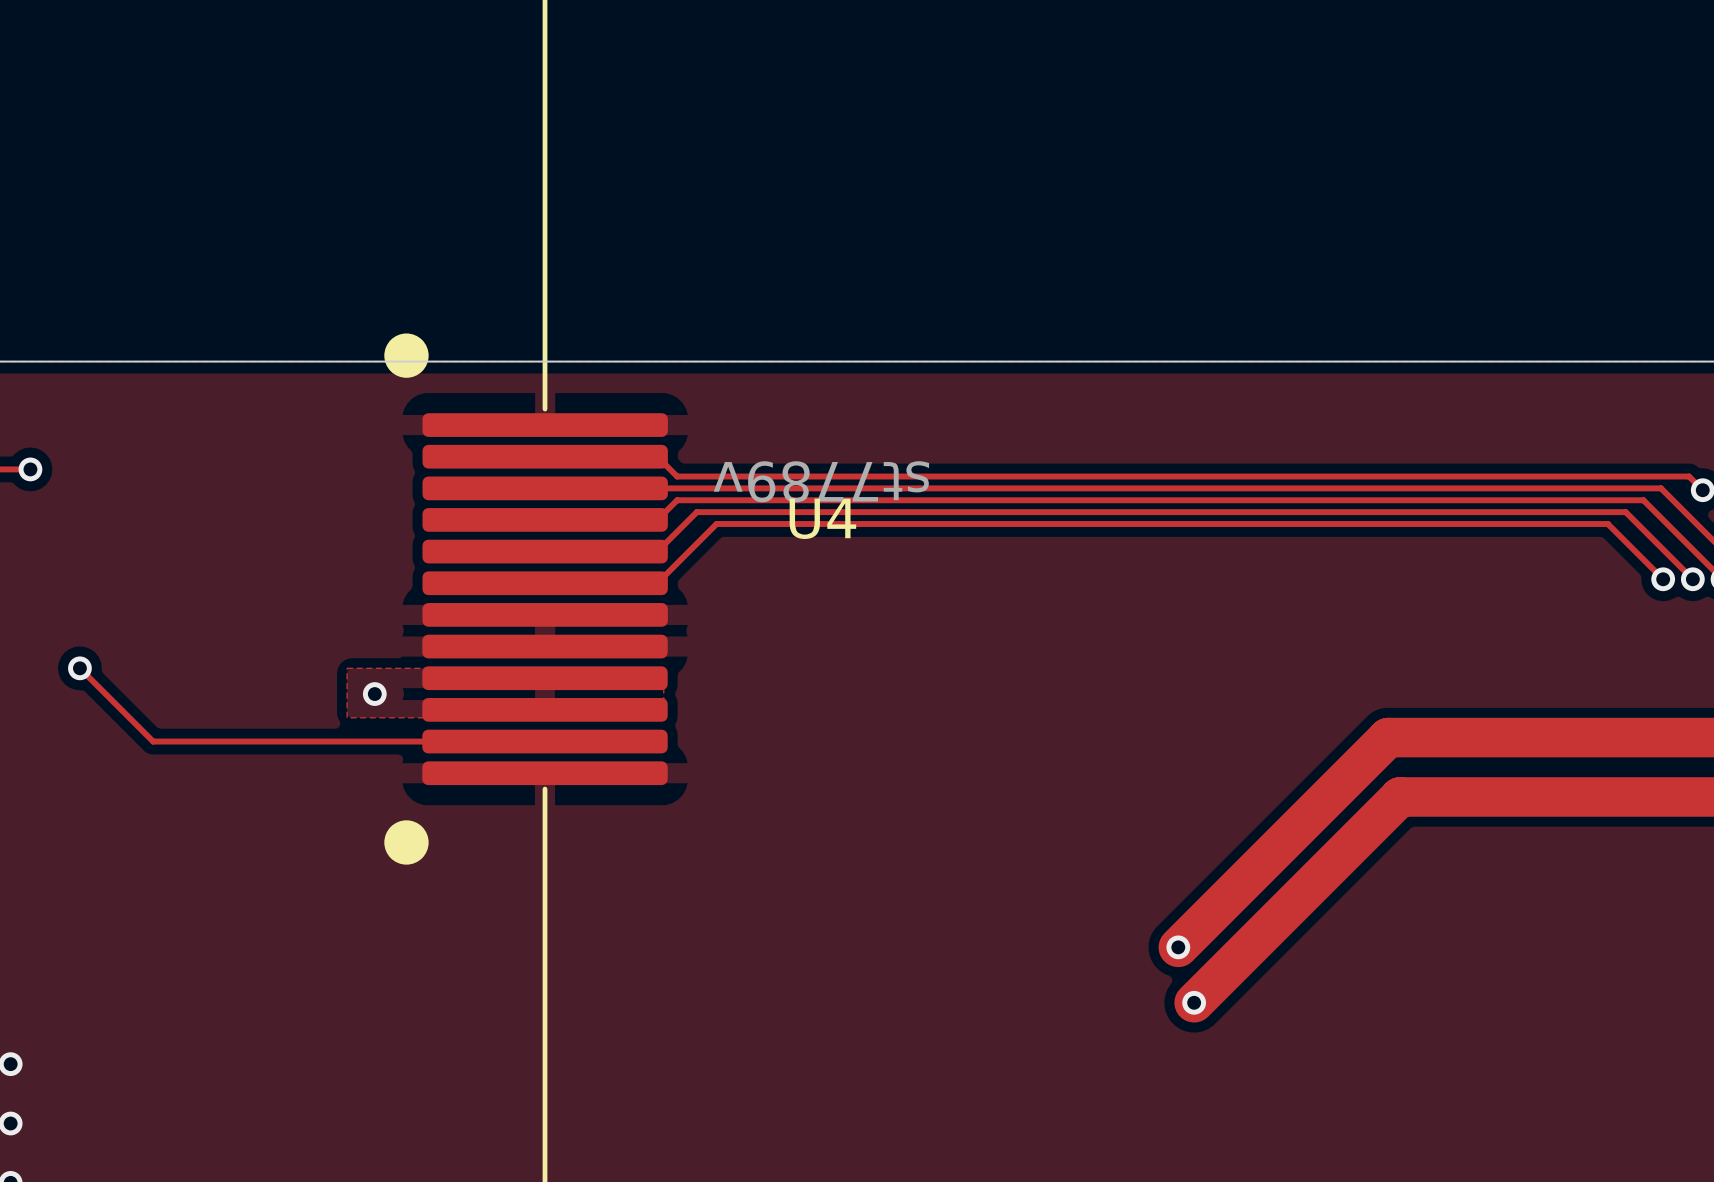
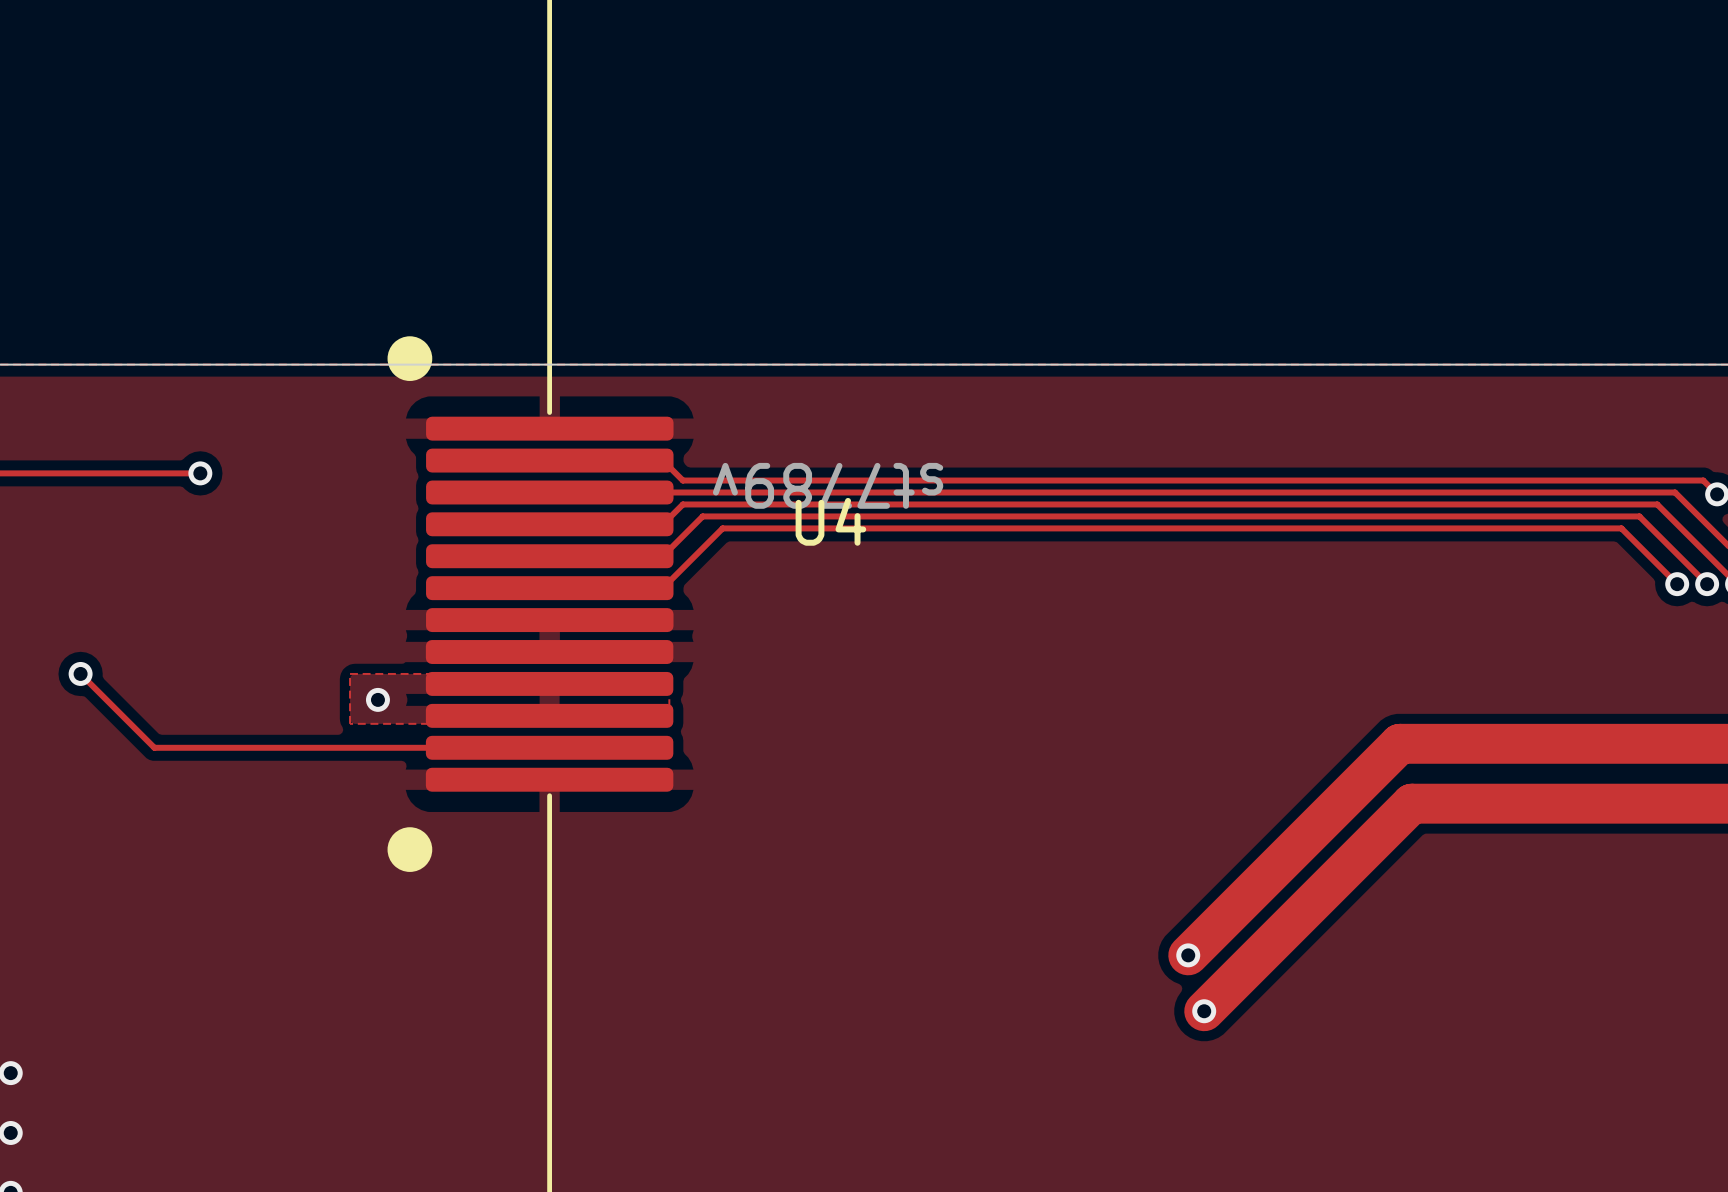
track: none -> (30, 473) (200, 473)
via position: (30, 469) -> (200, 473)

